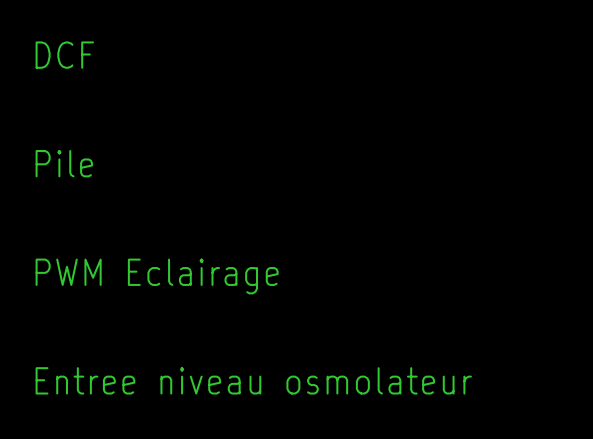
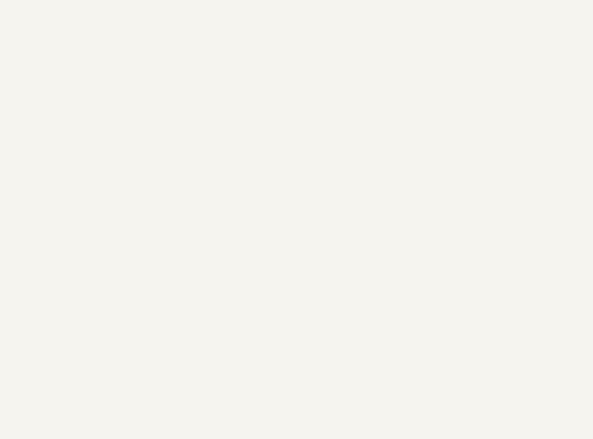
text: DCF (64, 55) -> none
text: Pile (64, 163) -> none
text: PWM Eclairage (157, 276) -> none
text: Entree niveau osmolateur (253, 380) -> none

